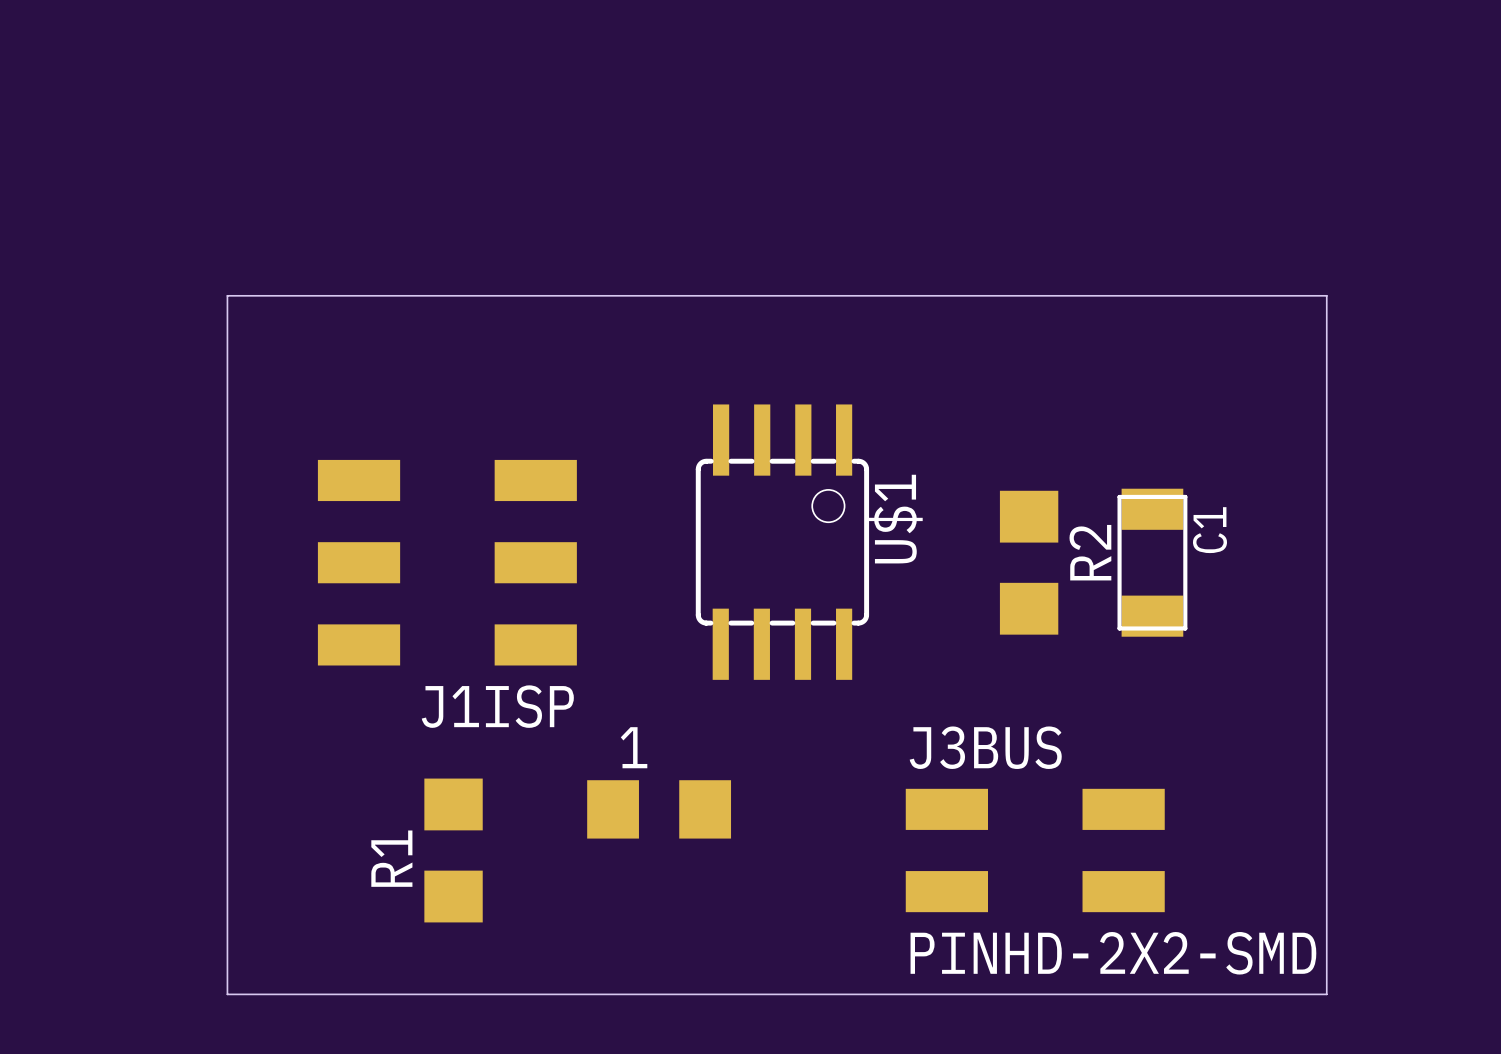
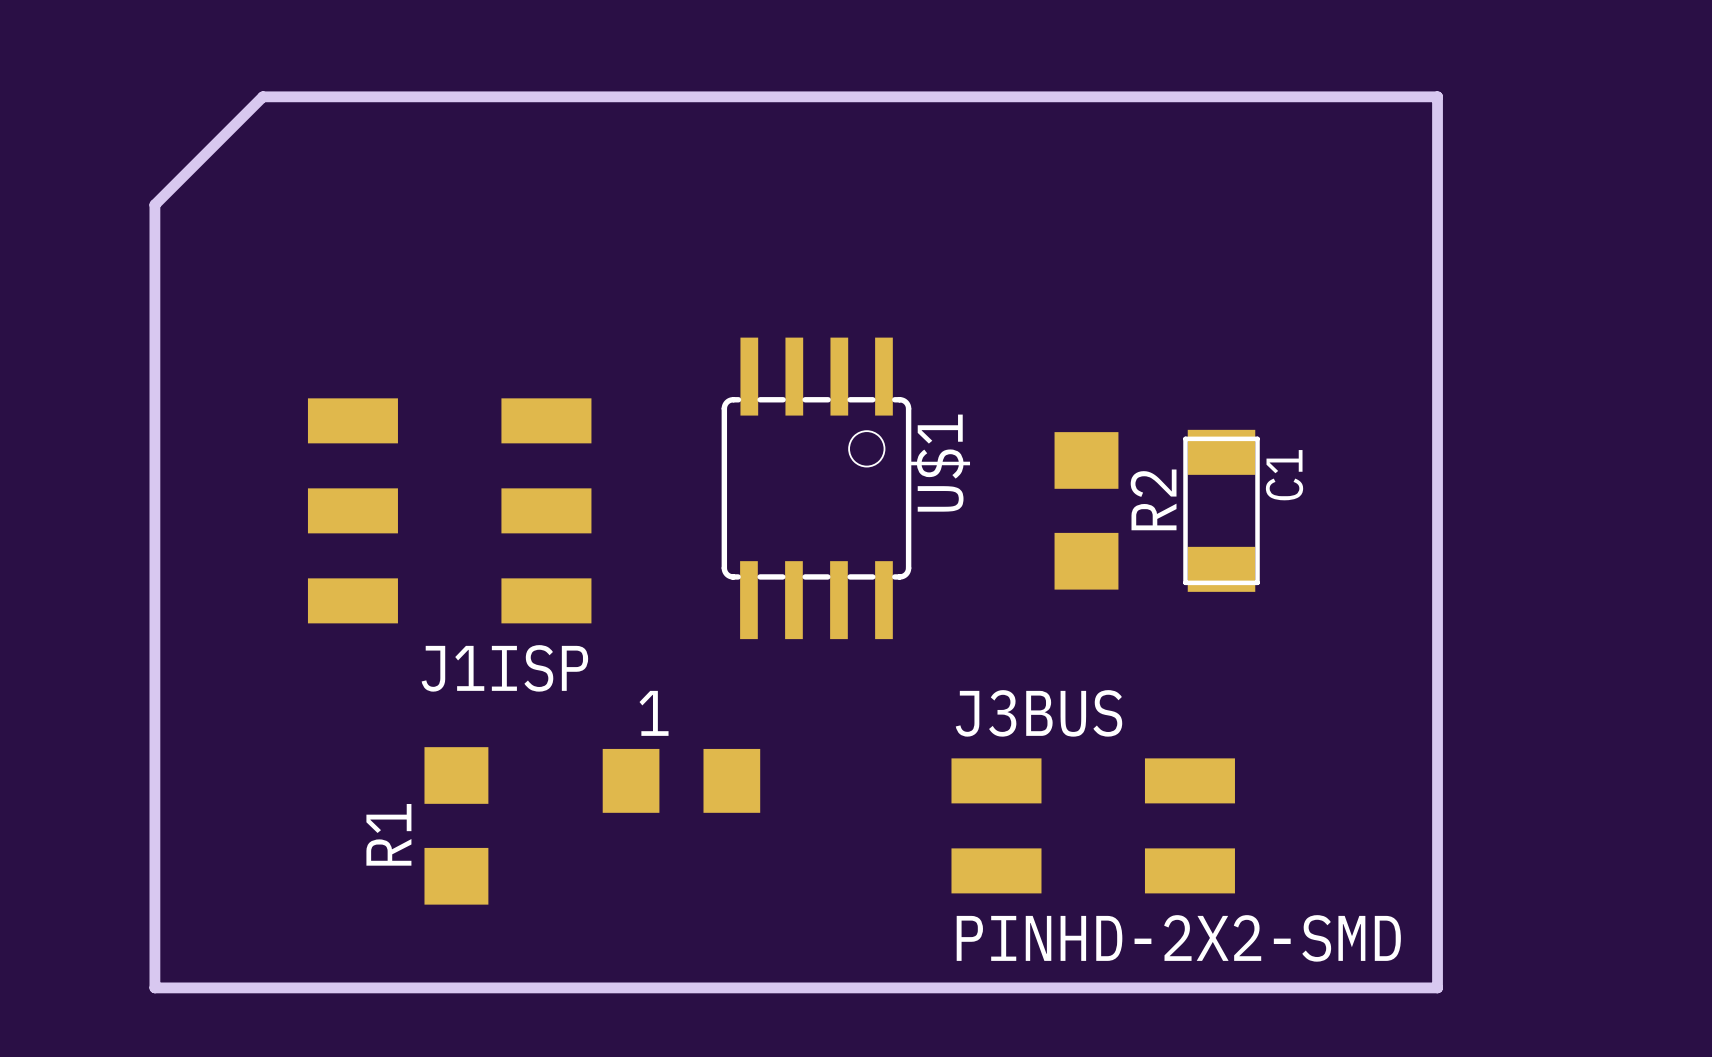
board edge: (227, 295) (1326, 295) (1326, 994) (227, 994) (227, 295) -> (262, 96) (154, 204) (154, 987) (1437, 987) (1437, 96) (262, 96)

